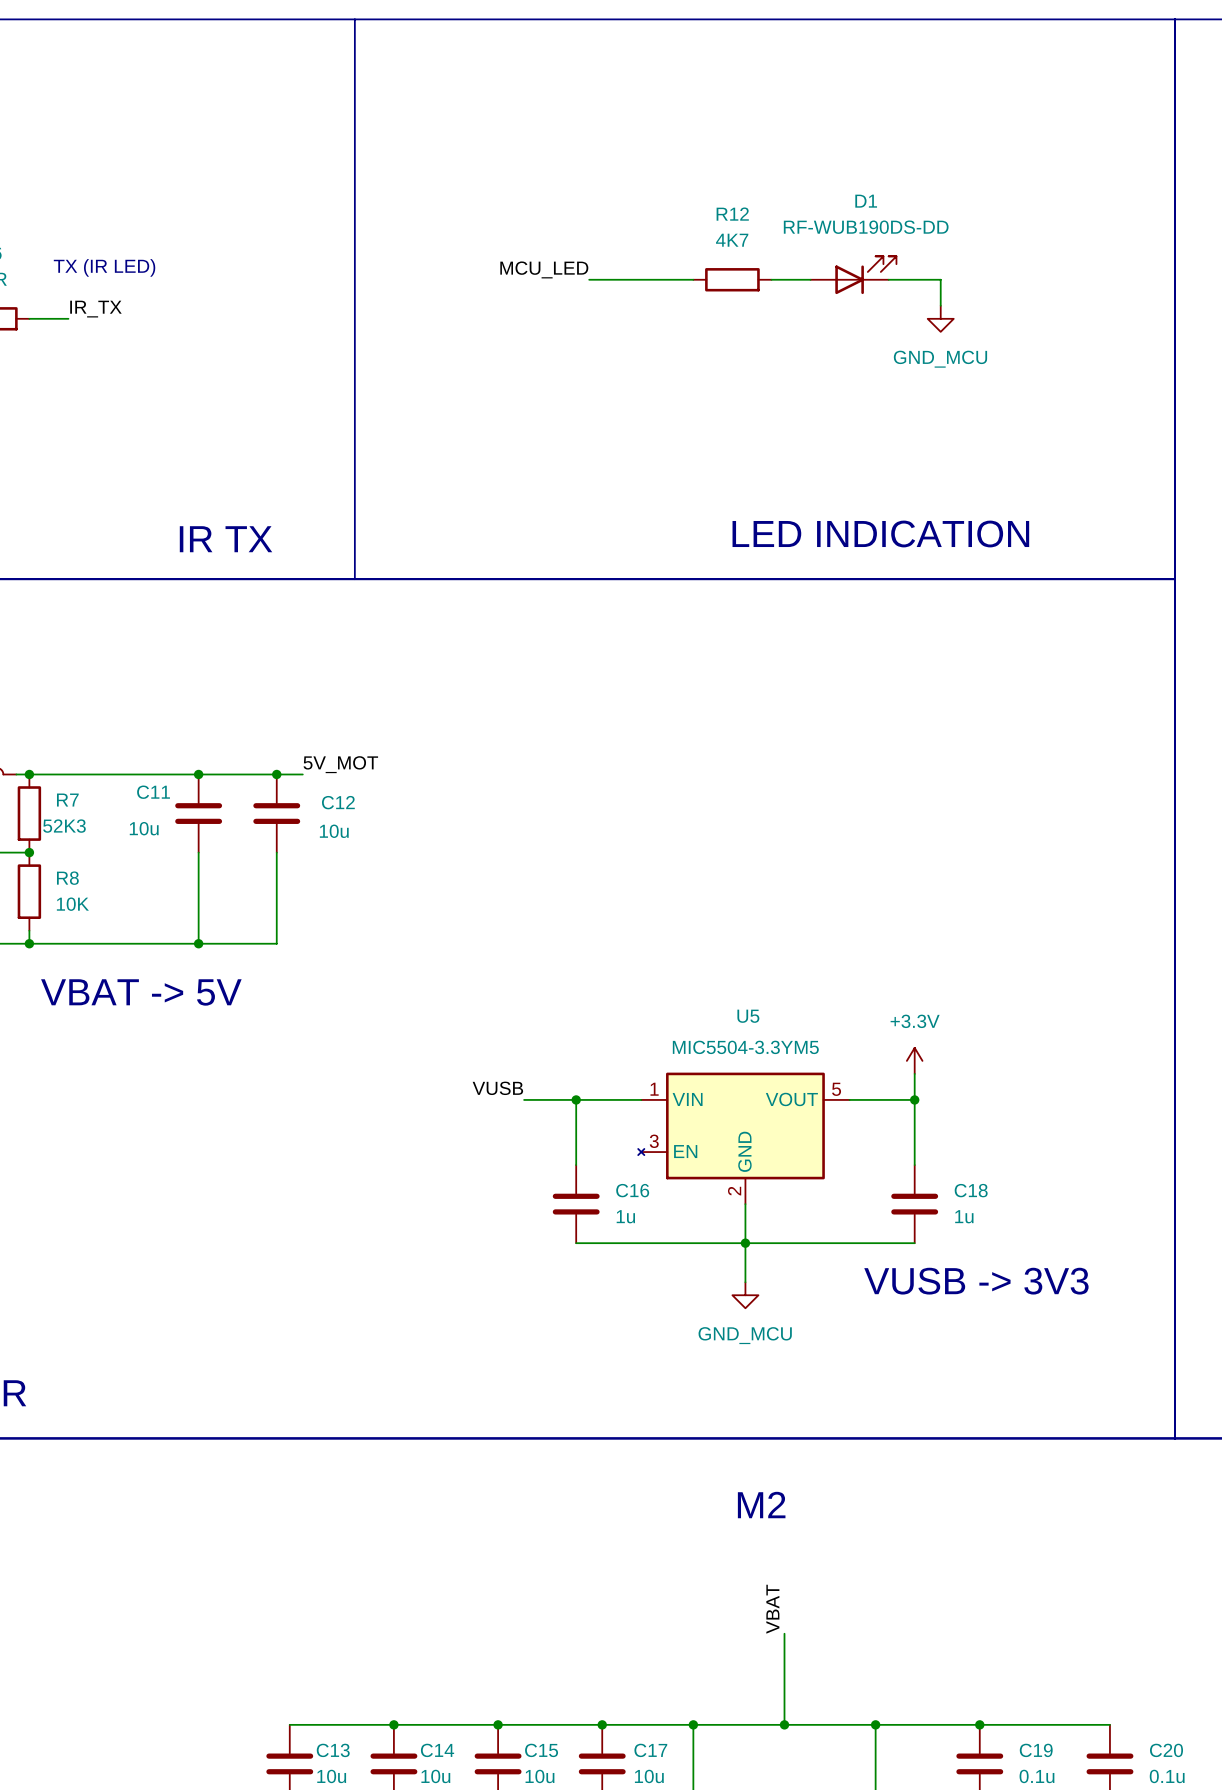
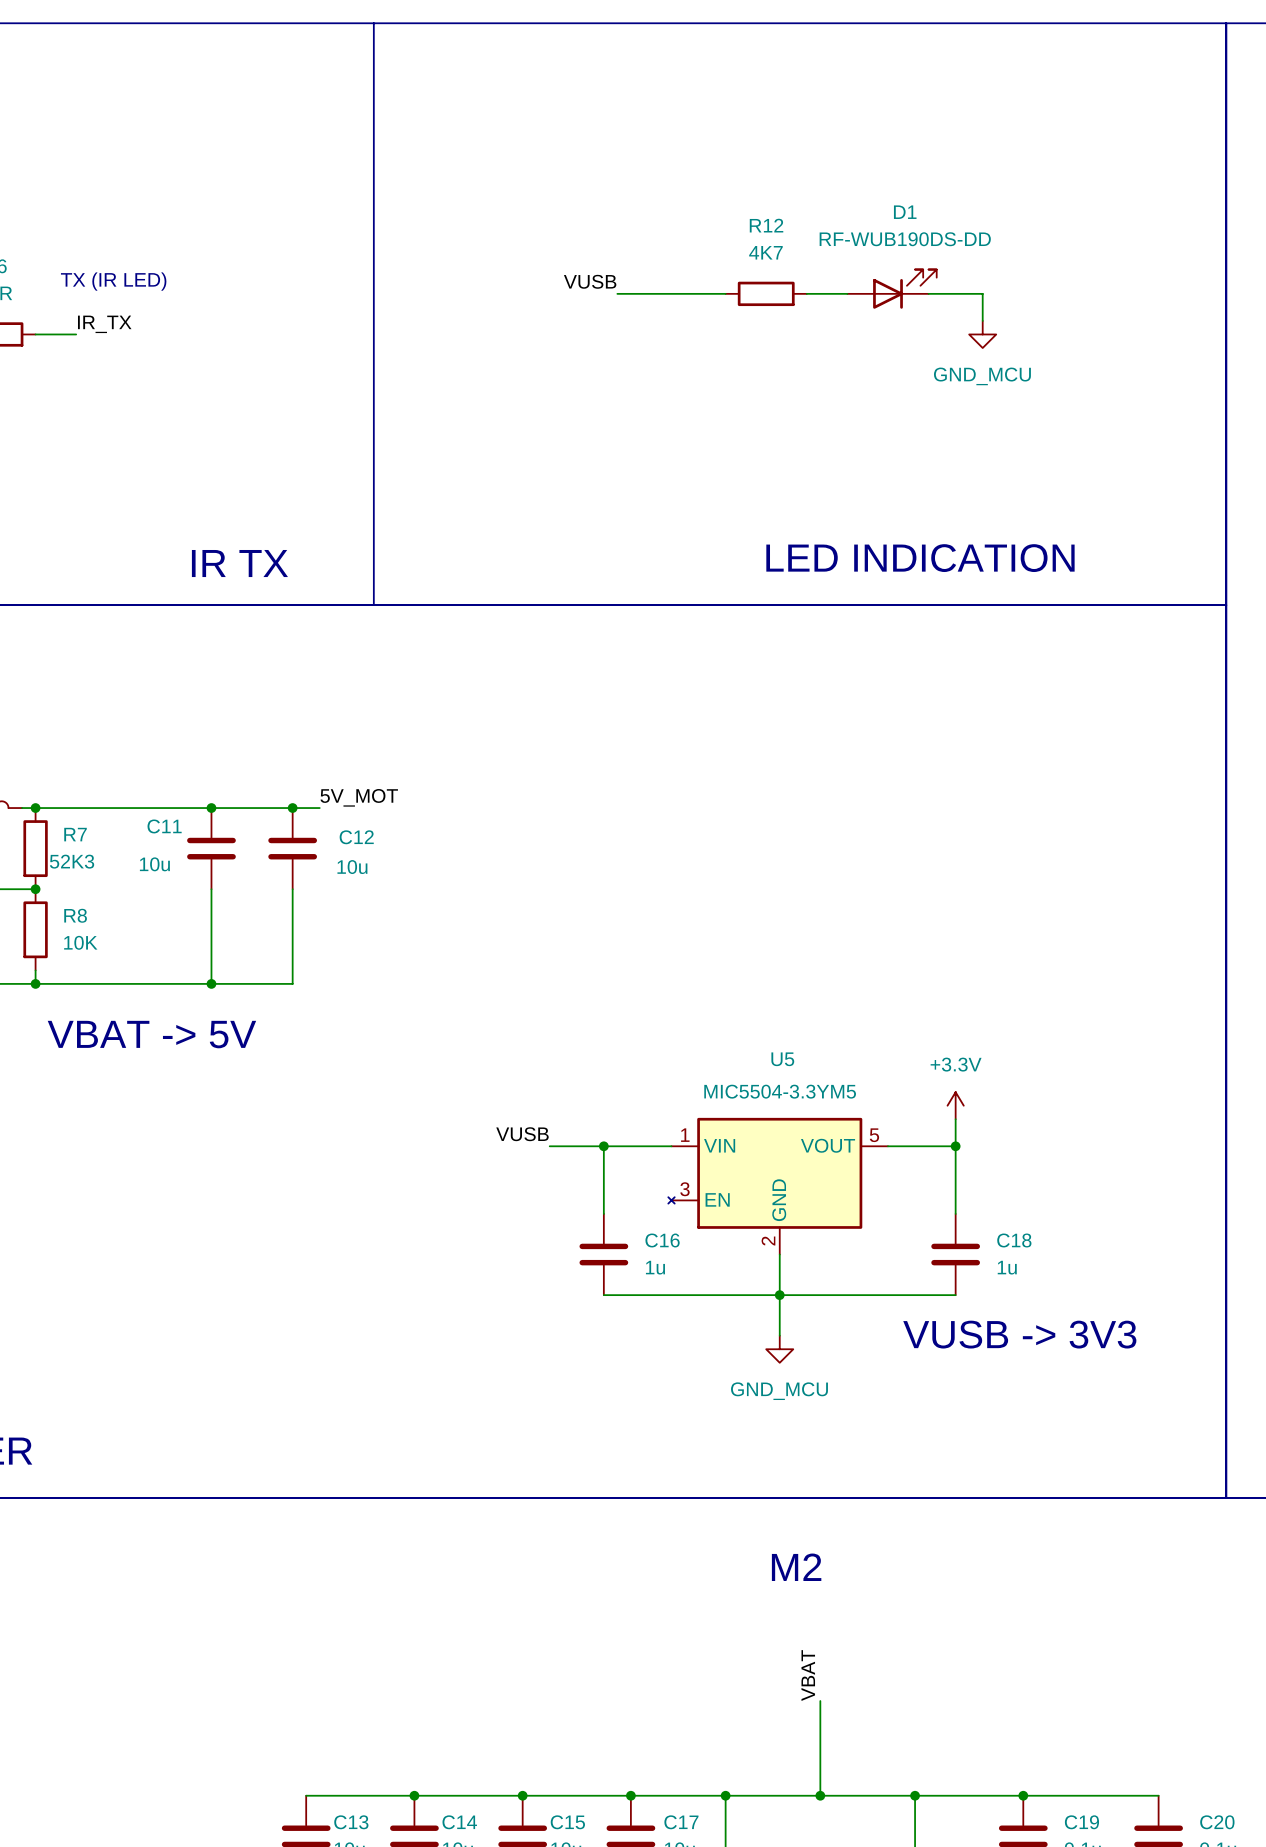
label: MCU_LED (544, 269) -> VUSB (590, 281)

